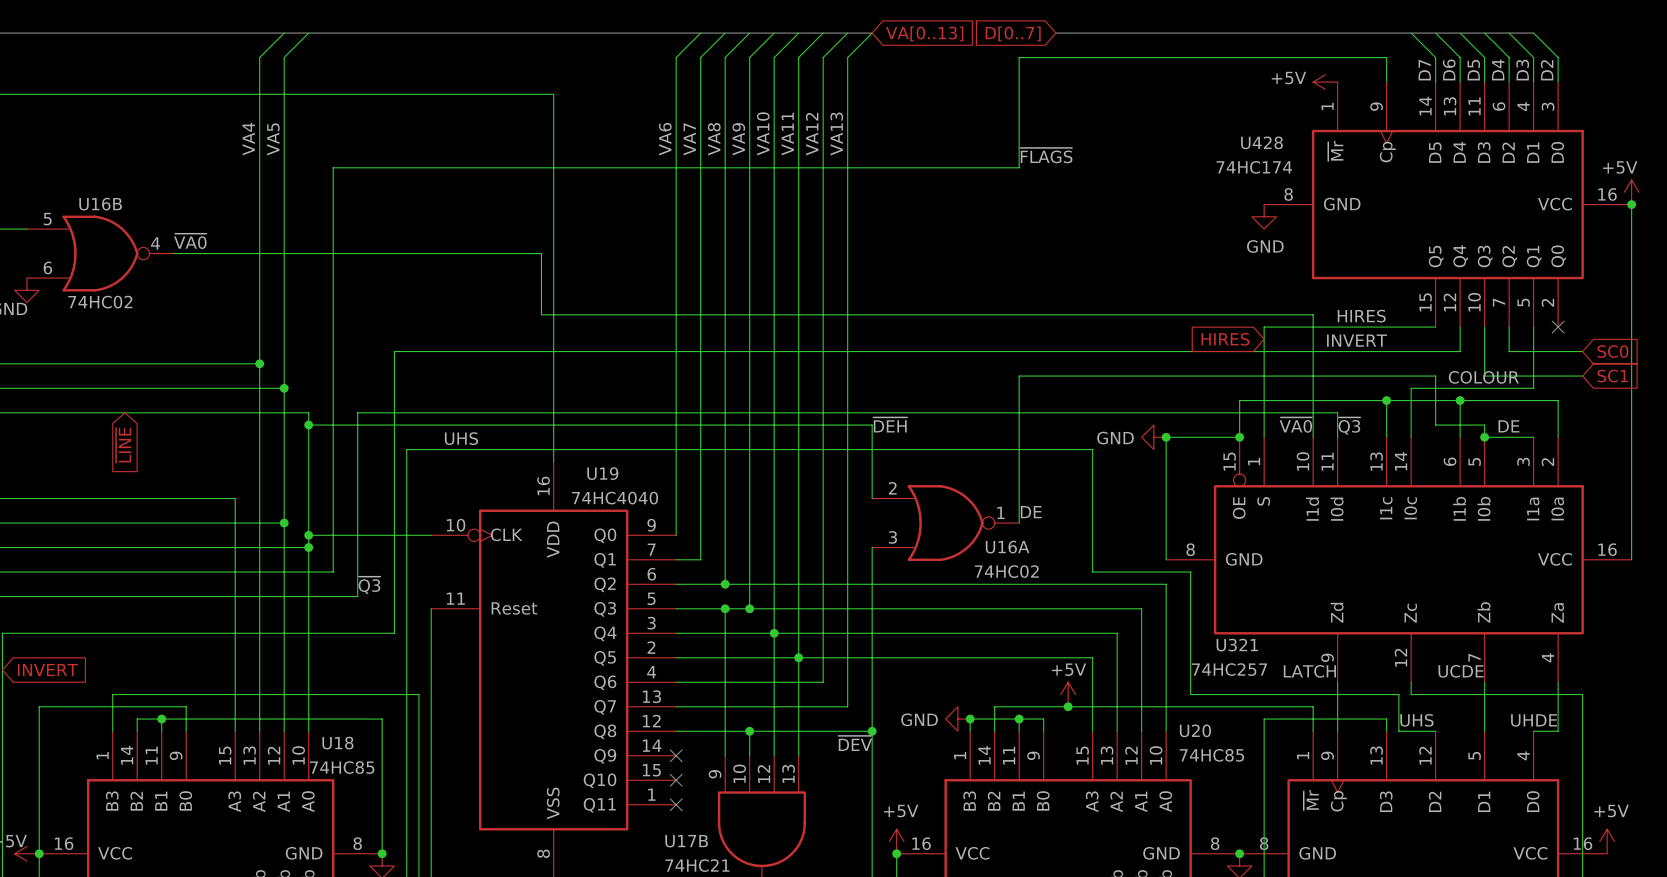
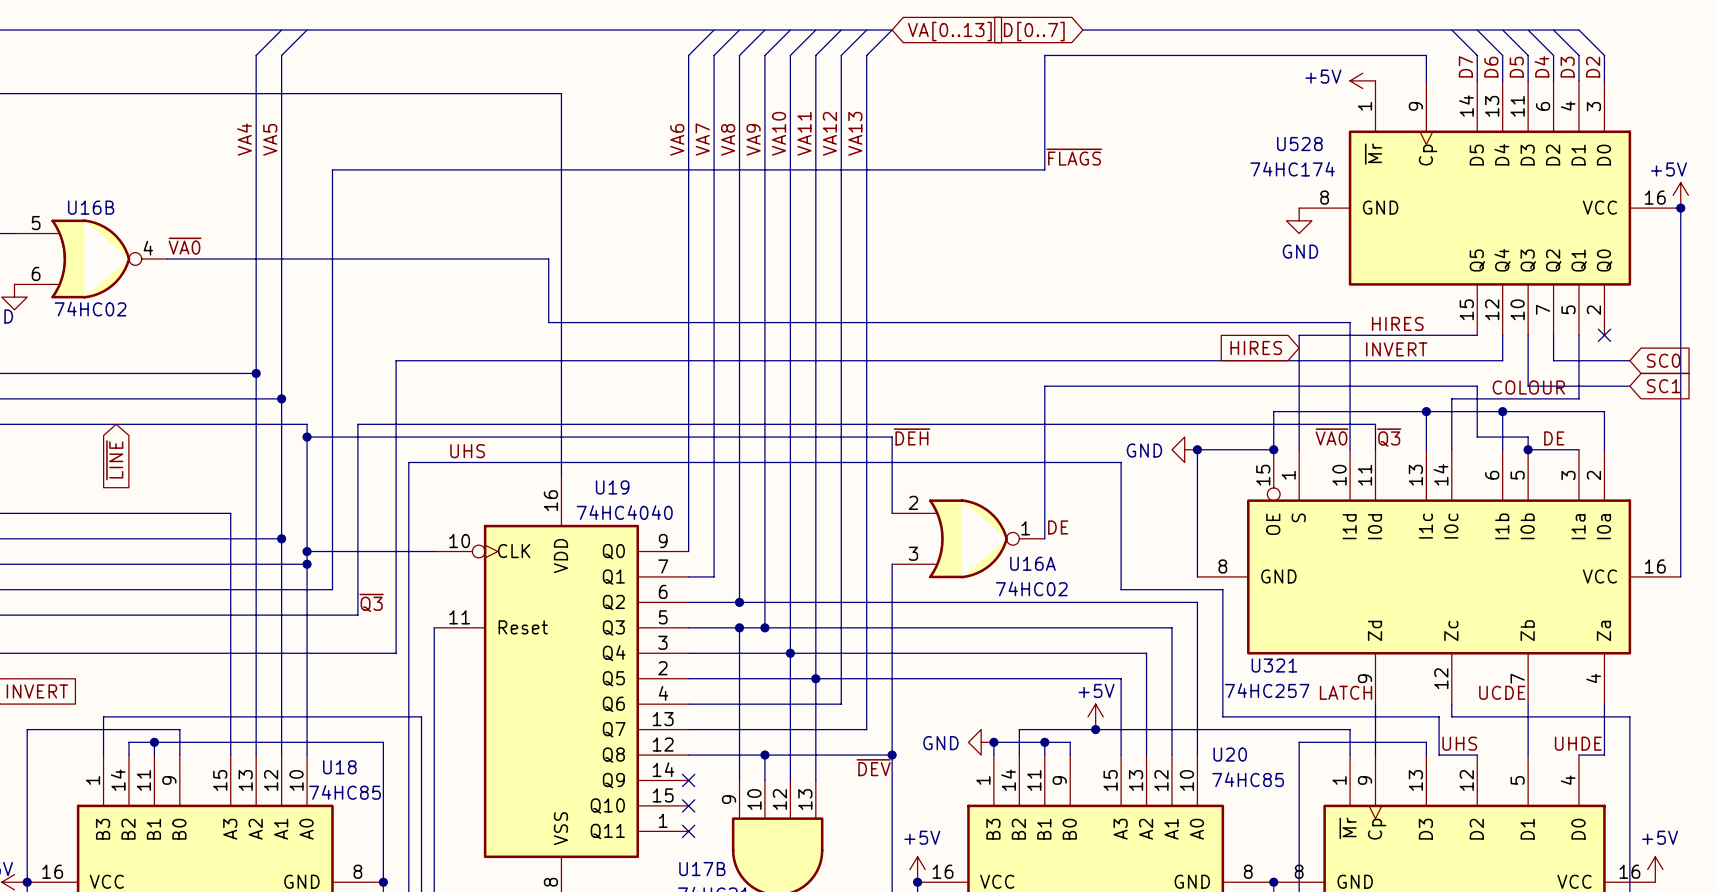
U428 name: U428 (1261, 142) -> U528 (1299, 144)

